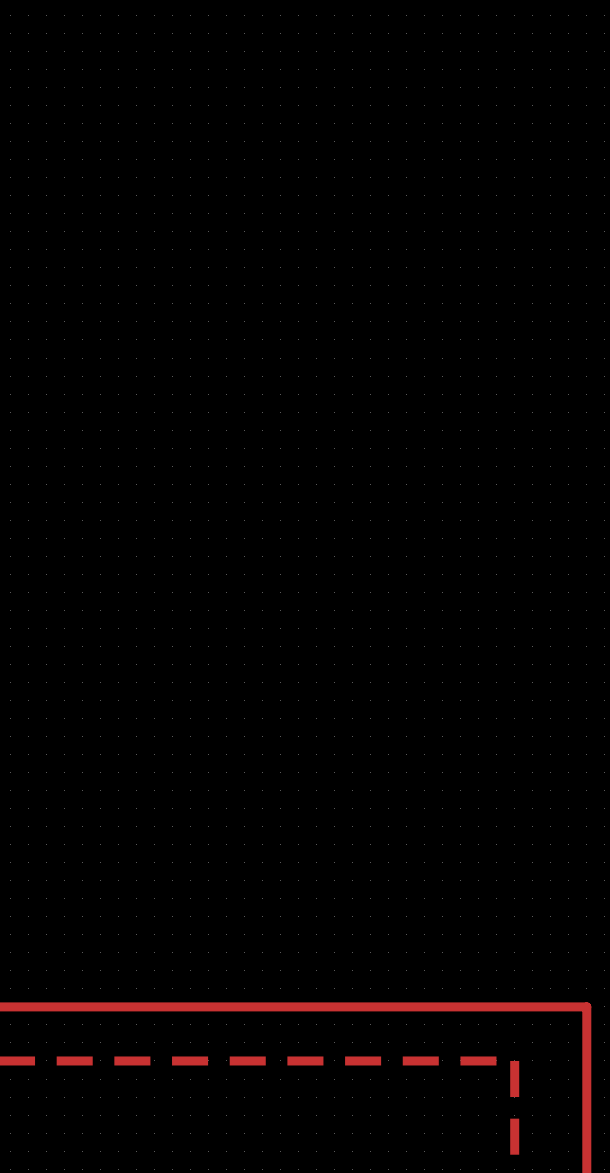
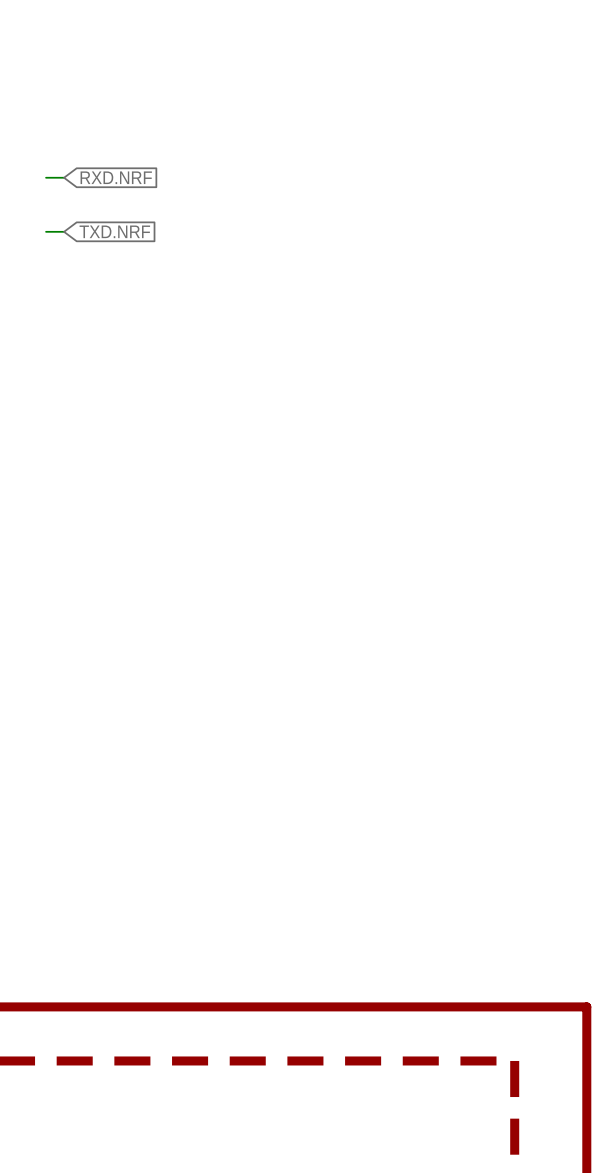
wire: none -> (46, 177) (64, 177)
global label: none -> RXD.NRF (116, 177)
wire: none -> (46, 231) (64, 231)
global label: none -> TXD.NRF (114, 231)

